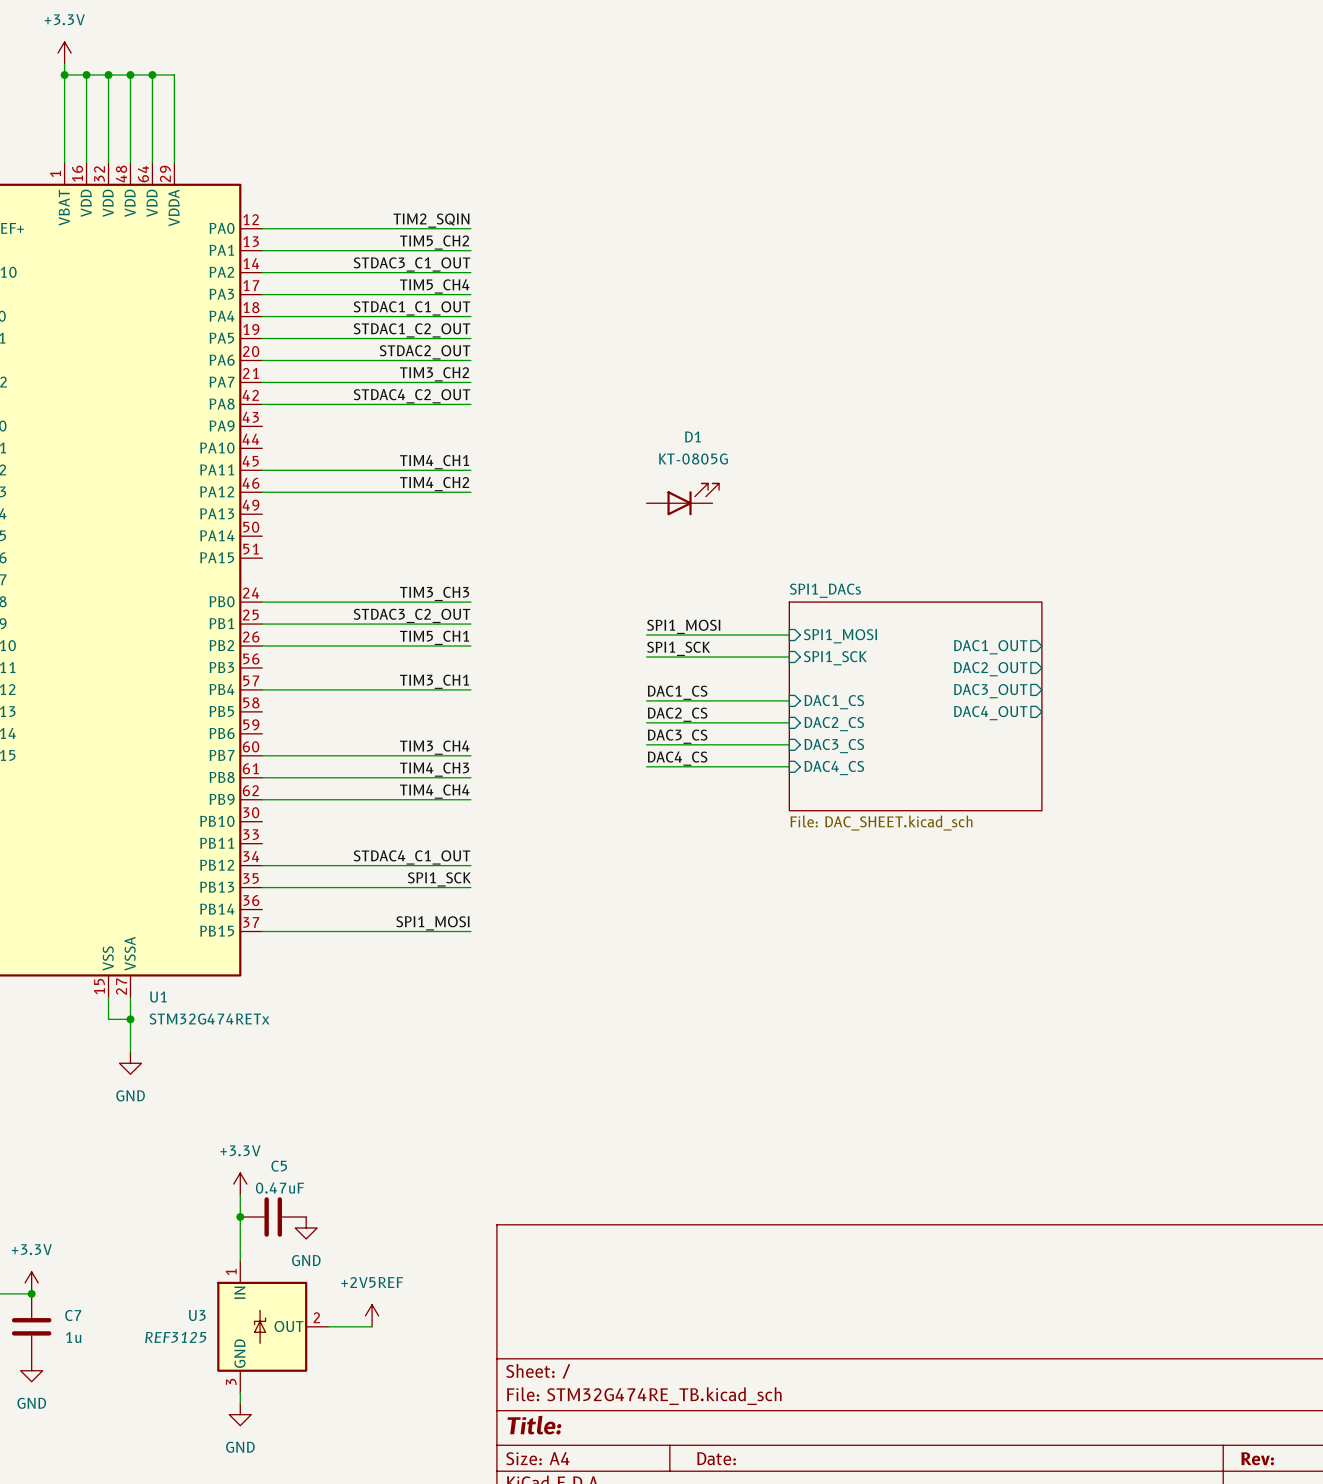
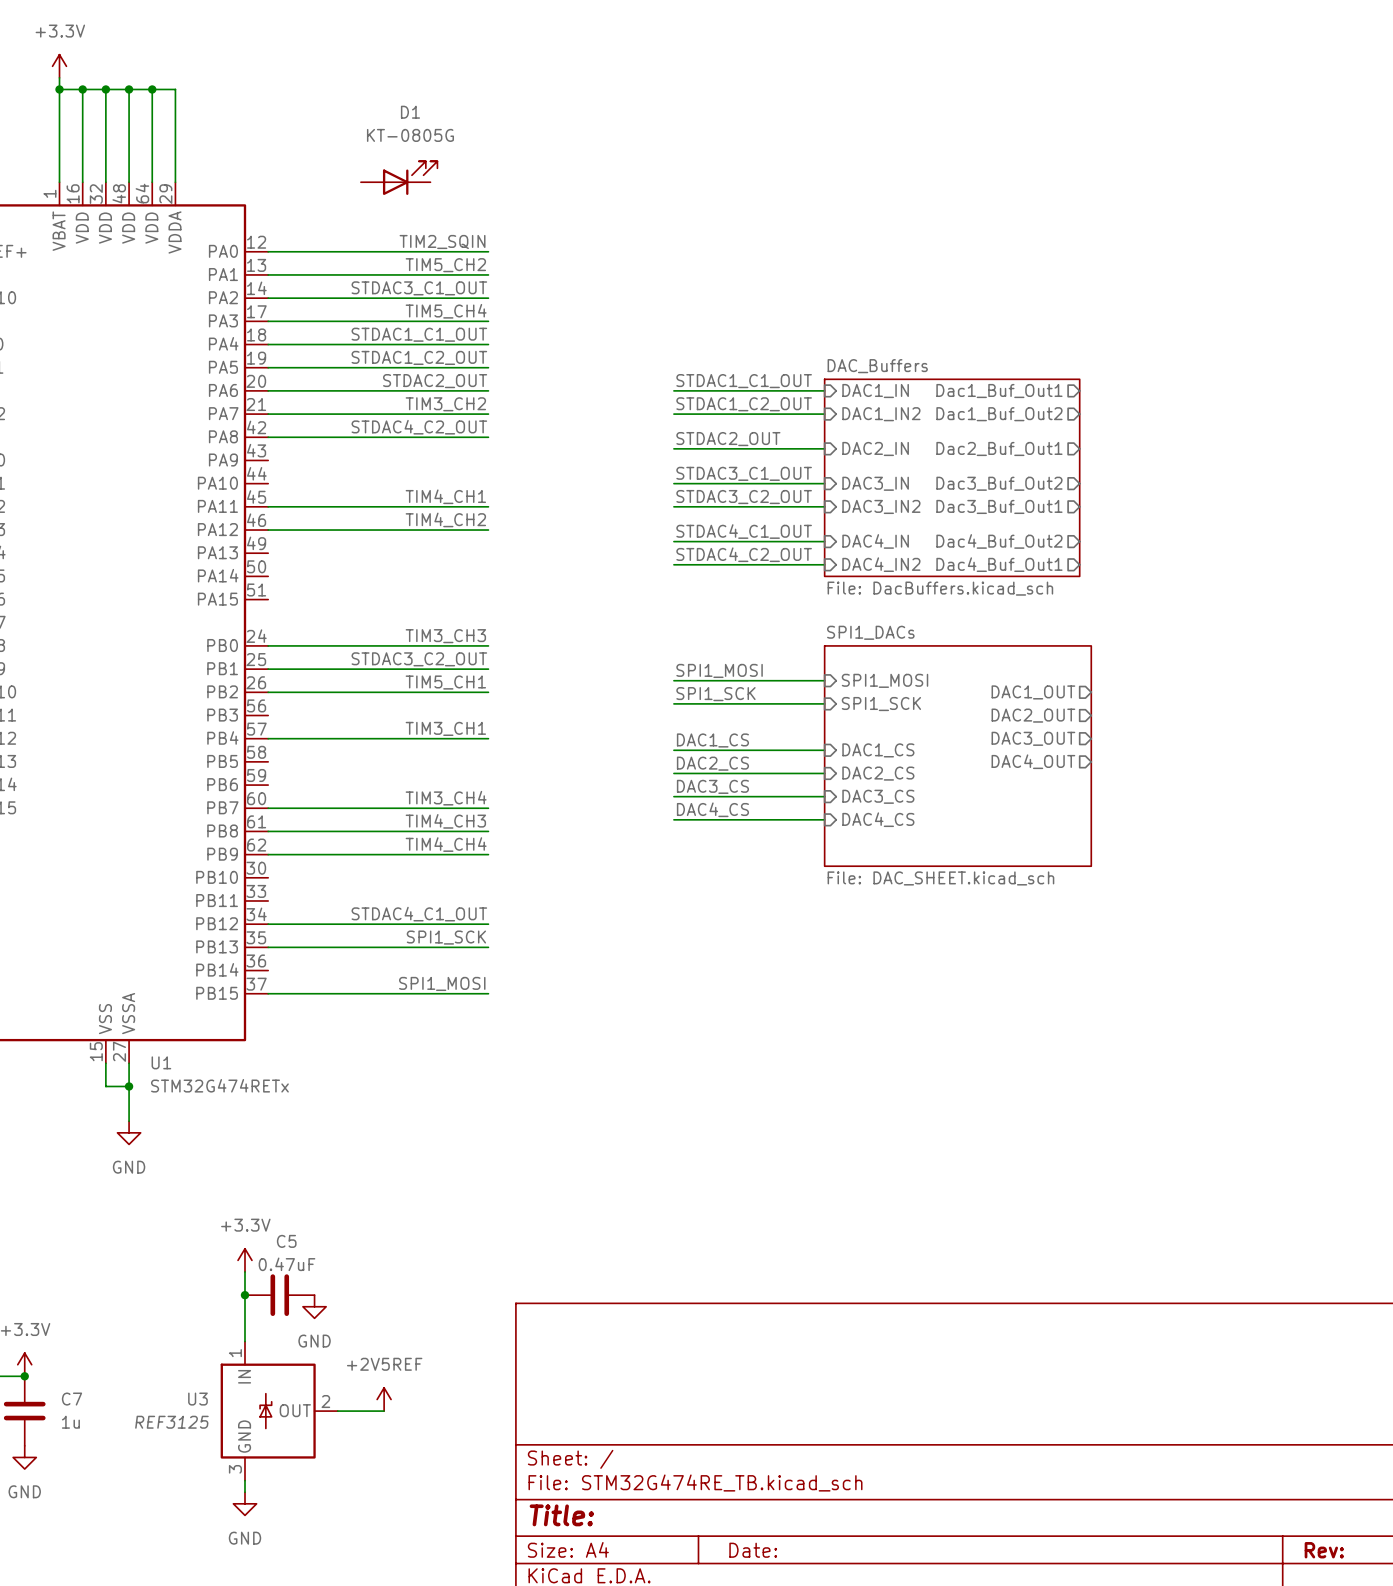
label: none -> STDAC1_C1_OUT (744, 381)
wire: none -> (673, 390) (824, 390)
sheet pin: none -> DAC1_IN (875, 391)
sheet pin: none -> Dac1_Buf_Out1 (999, 391)
label: none -> STDAC1_C2_OUT (744, 404)
wire: none -> (673, 414) (824, 414)
sheet pin: none -> DAC1_IN2 (881, 414)
sheet pin: none -> Dac1_Buf_Out2 (999, 414)
label: none -> STDAC2_OUT (728, 439)
wire: none -> (673, 448) (824, 448)
sheet pin: none -> DAC2_IN (875, 448)
sheet pin: none -> Dac2_Buf_Out1 (999, 448)
label: none -> STDAC3_C1_OUT (744, 473)
sheet DAC_Buffers: none -> File: DacBuffers.kicad_sch (952, 477)
wire: none -> (673, 483) (824, 483)
sheet pin: none -> DAC3_IN (875, 483)
sheet pin: none -> Dac3_Buf_Out2 (999, 483)
label: none -> STDAC3_C2_OUT (744, 497)
wire: none -> (673, 506) (824, 506)
sheet pin: none -> DAC3_IN2 (881, 506)
sheet pin: none -> Dac3_Buf_Out1 (999, 506)
label: none -> STDAC4_C1_OUT (744, 531)
D1 position: (682, 499) -> (399, 178)
wire: none -> (673, 541) (824, 541)
sheet pin: none -> DAC4_IN (875, 541)
sheet pin: none -> Dac4_Buf_Out2 (999, 541)
label: none -> STDAC4_C2_OUT (744, 554)
wire: none -> (673, 564) (824, 564)
sheet pin: none -> DAC4_IN2 (881, 564)
sheet pin: none -> Dac4_Buf_Out1 (999, 564)

